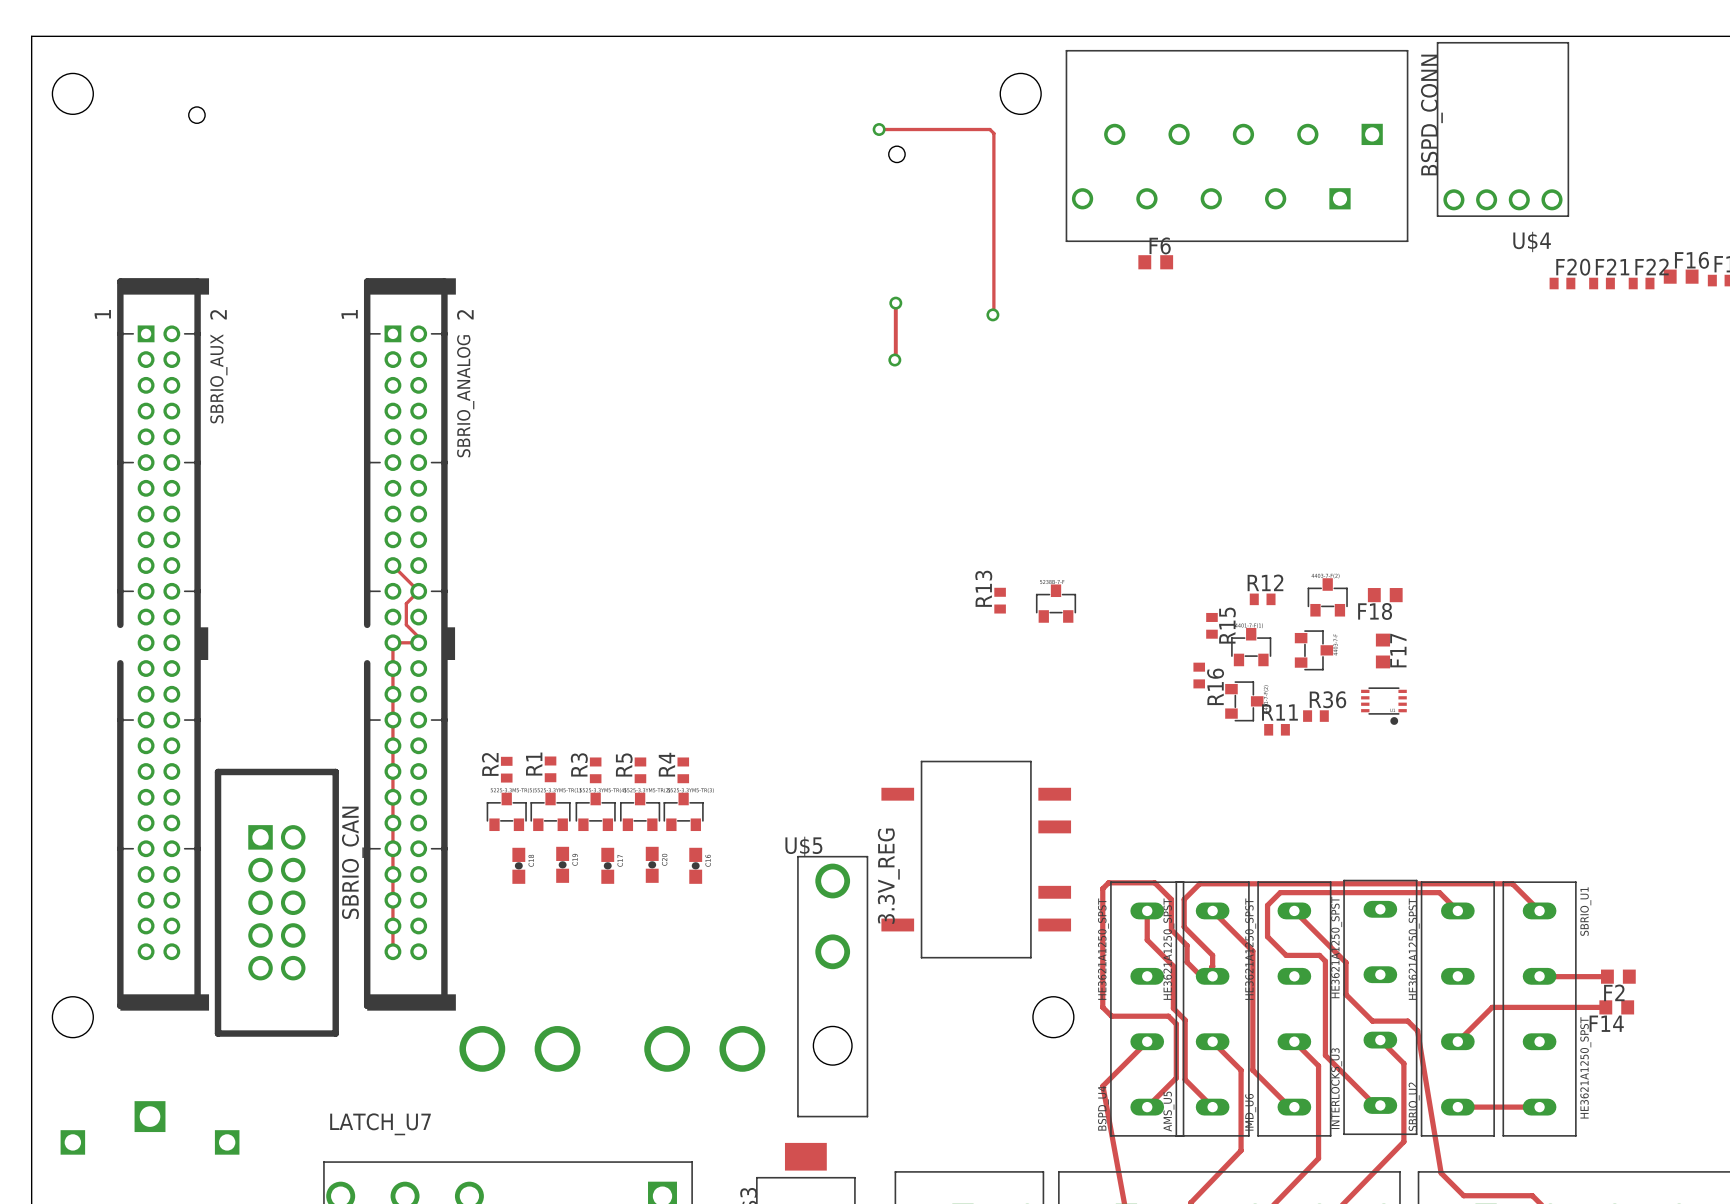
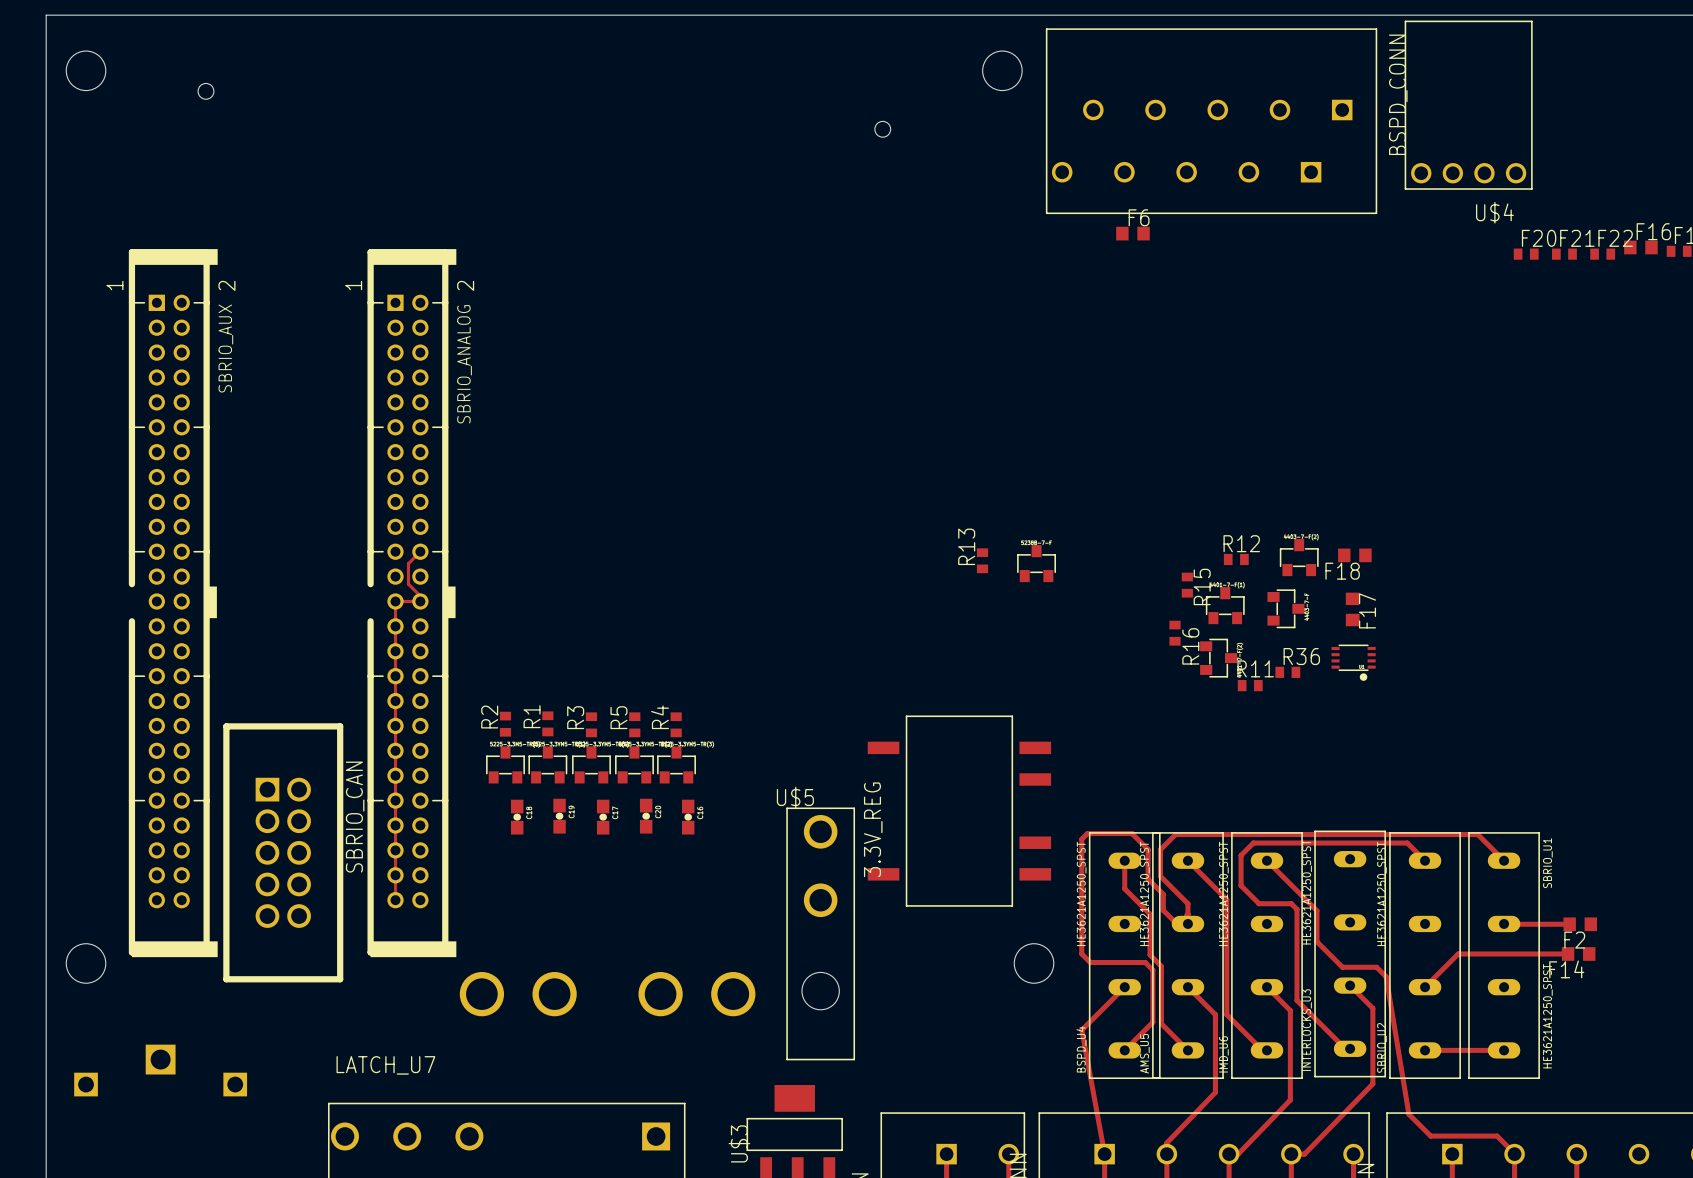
track: (879, 129) (989, 129) (993, 133) (992, 314) -> none
via: (879, 129) -> none
track: (895, 303) (894, 360) -> none
via: (895, 303) -> none
via: (992, 314) -> none
via: (894, 360) -> none
track: (392, 565) (418, 591) -> none

